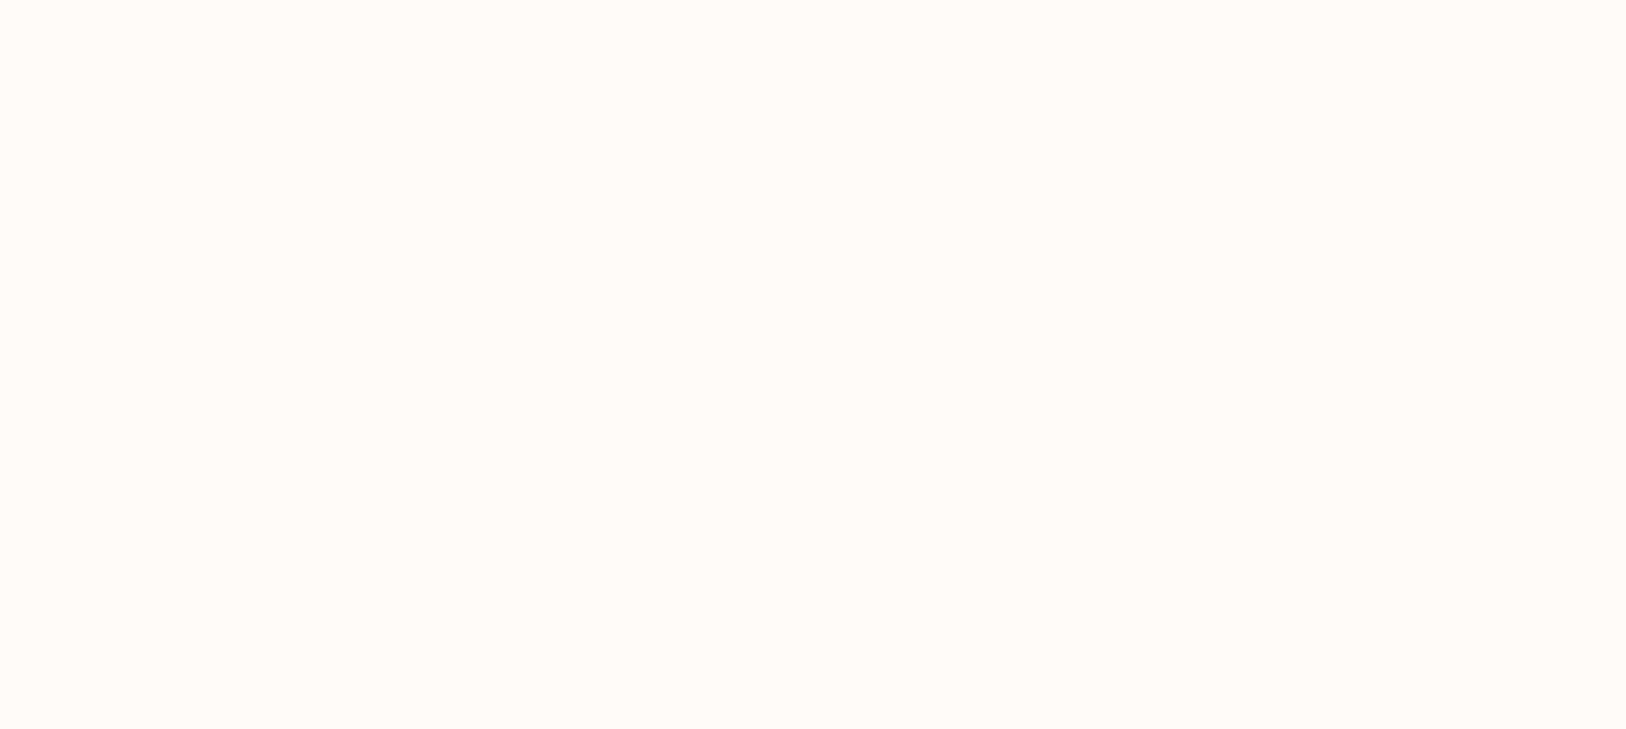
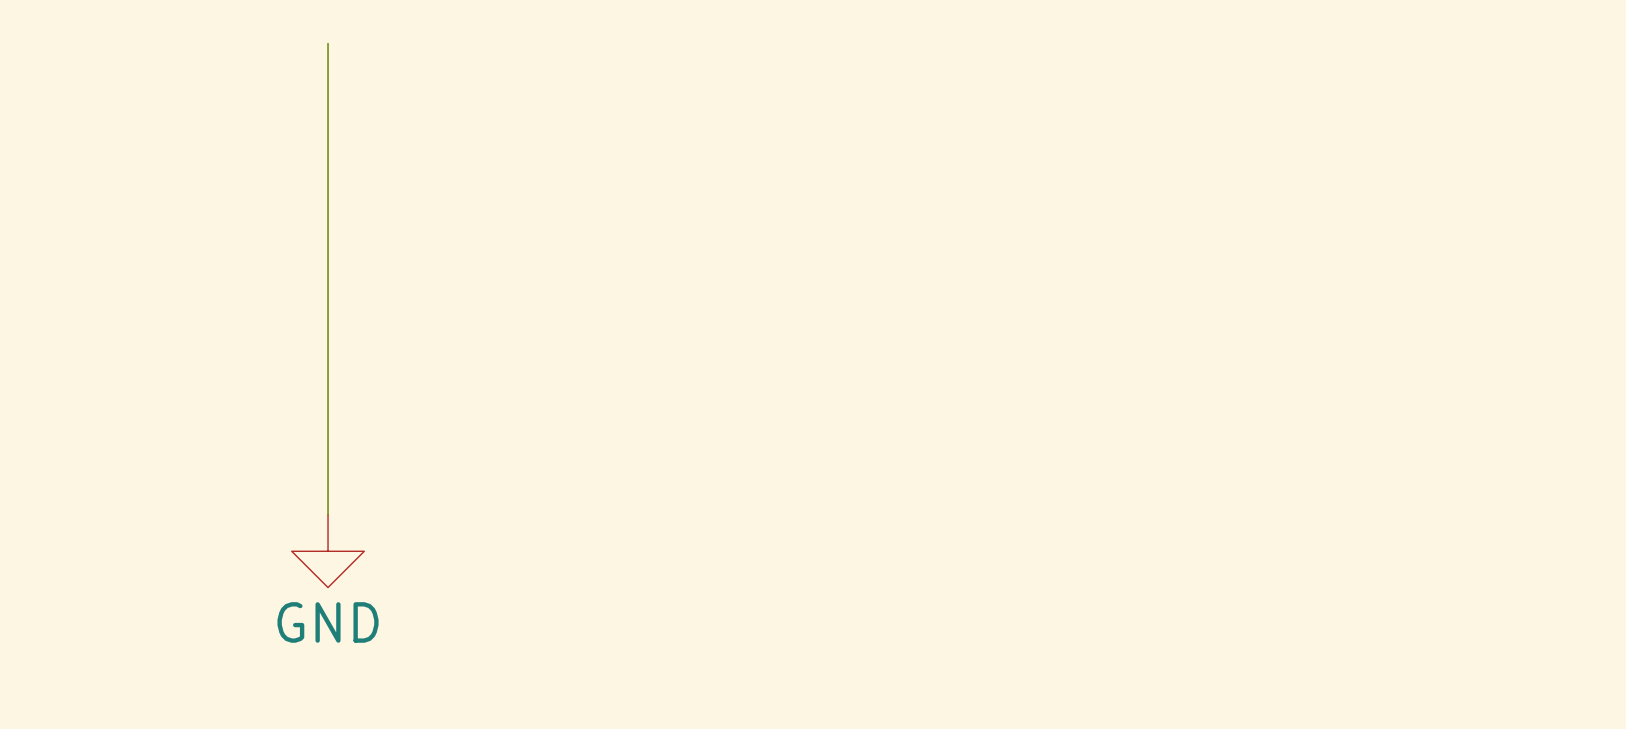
wire: none -> (328, 43) (328, 515)
power symbol: none -> GND (328, 551)

